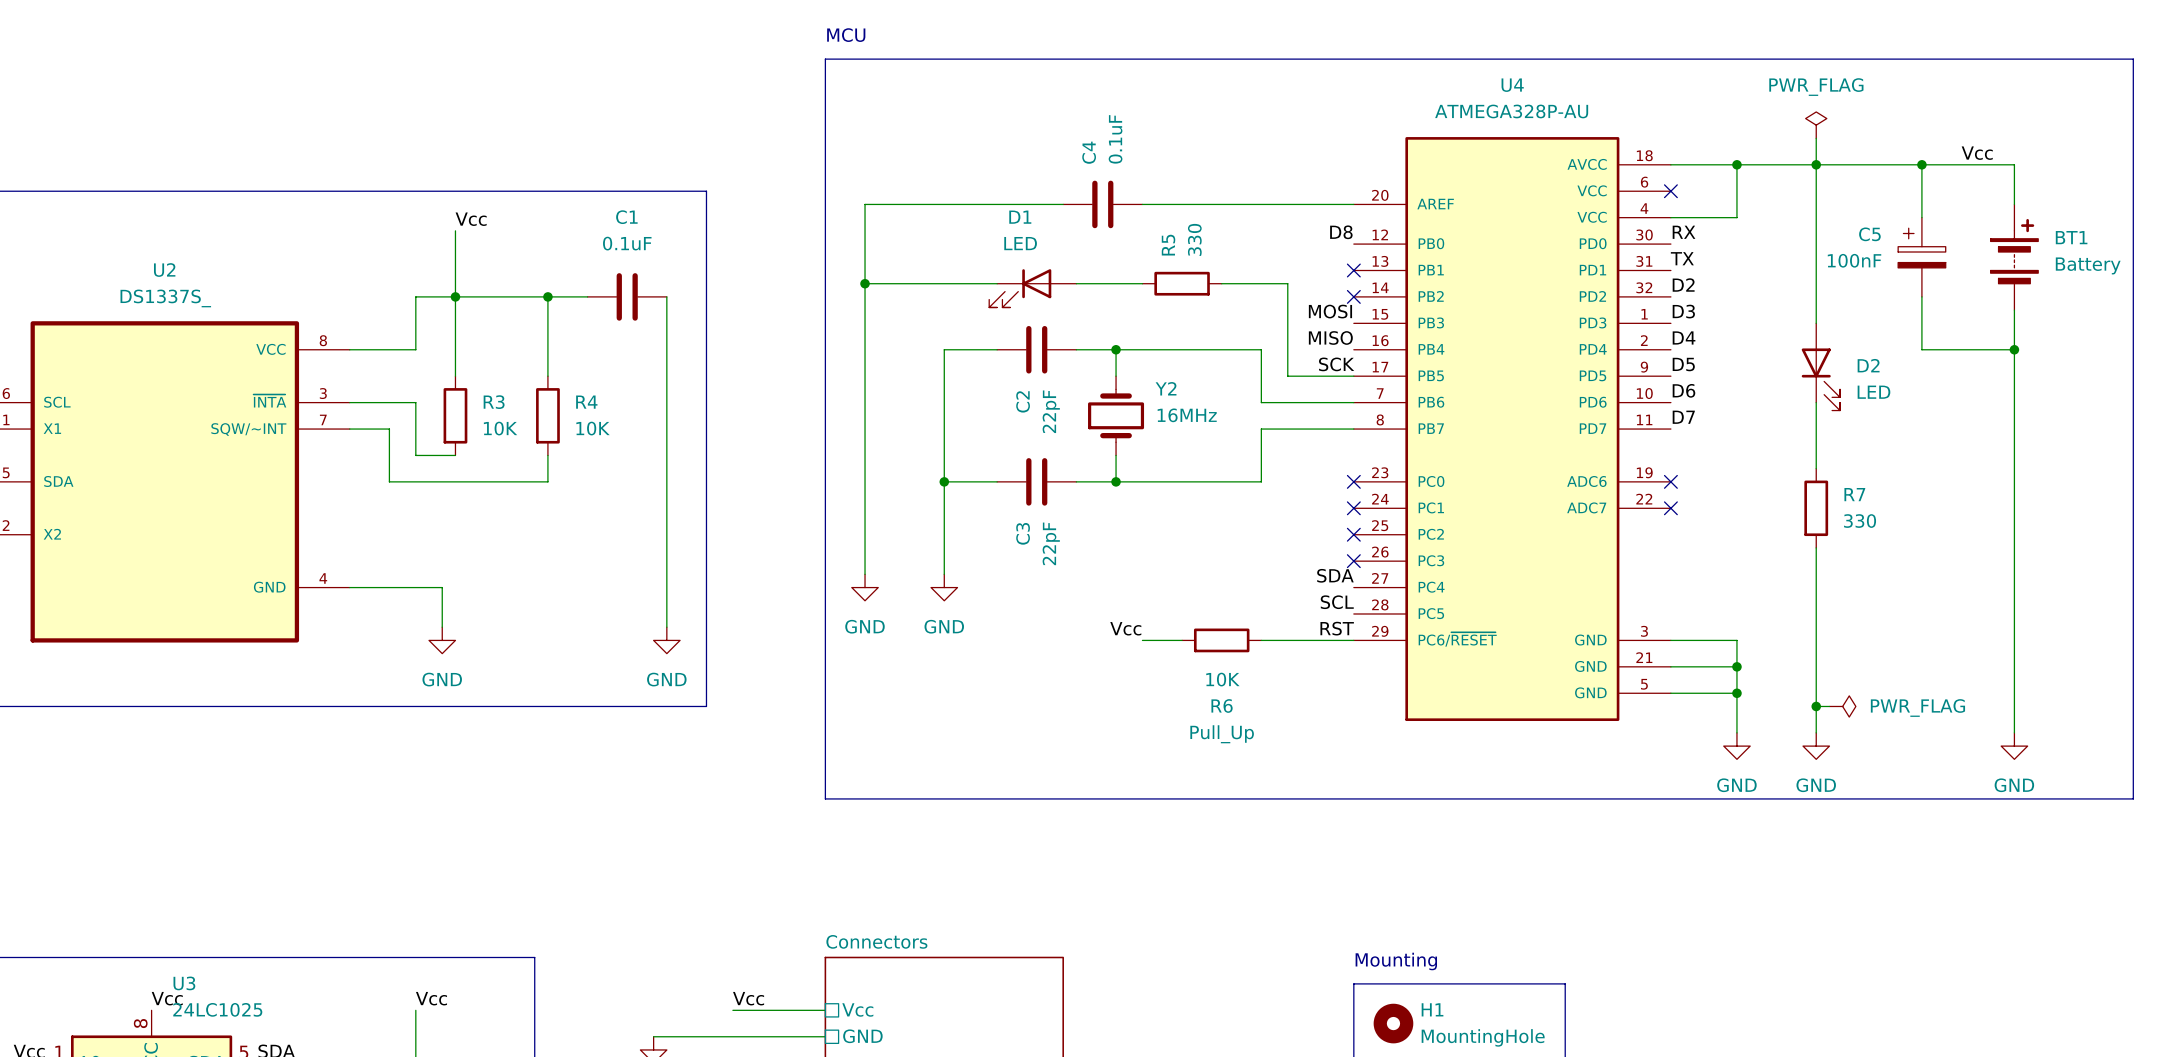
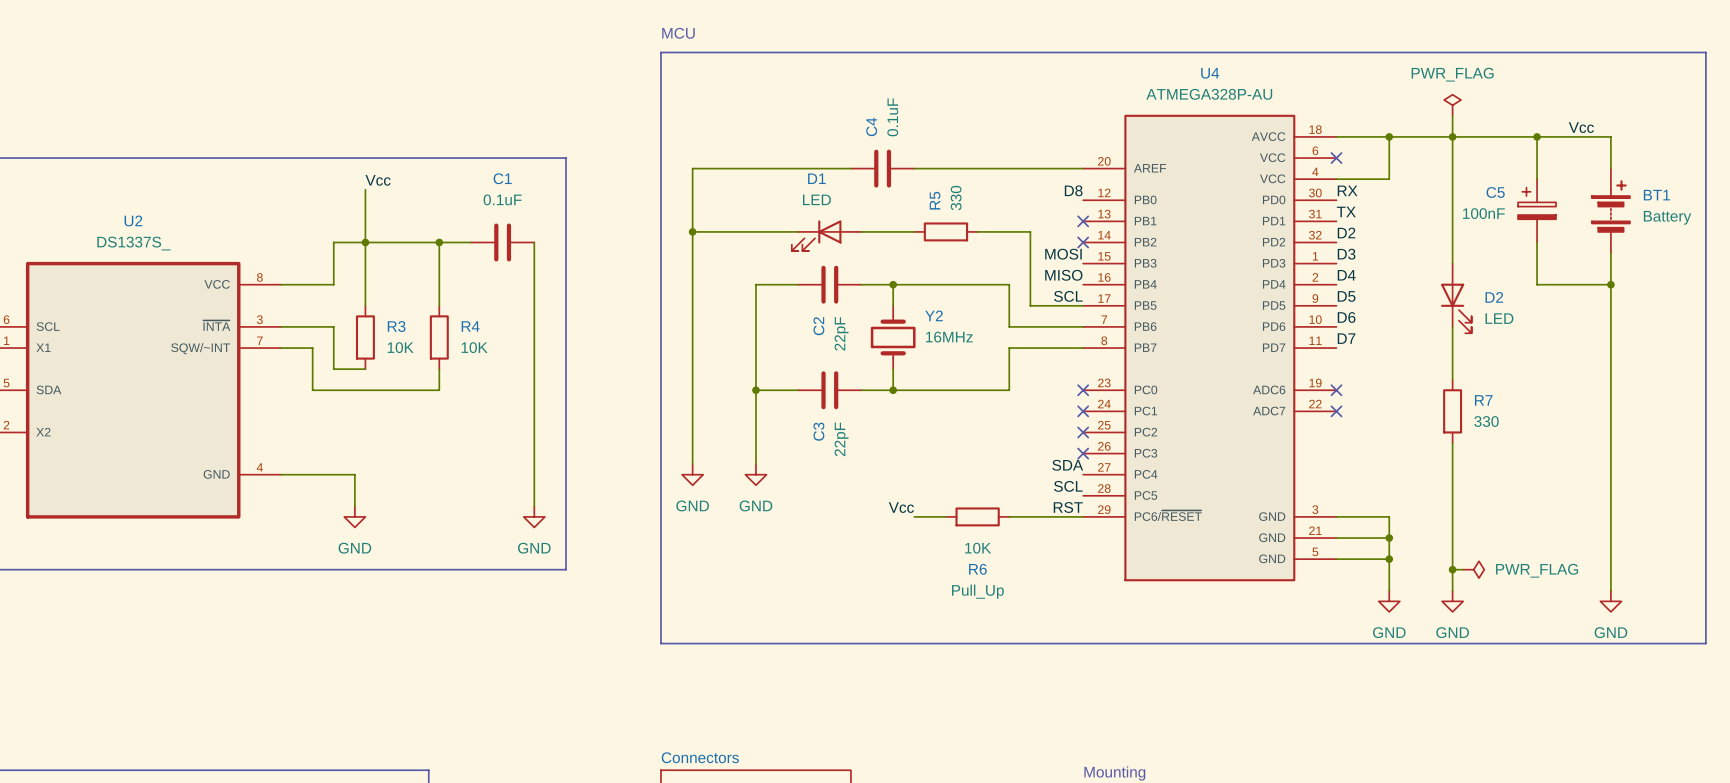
label: SCK (1336, 364) -> SCL (1068, 296)

